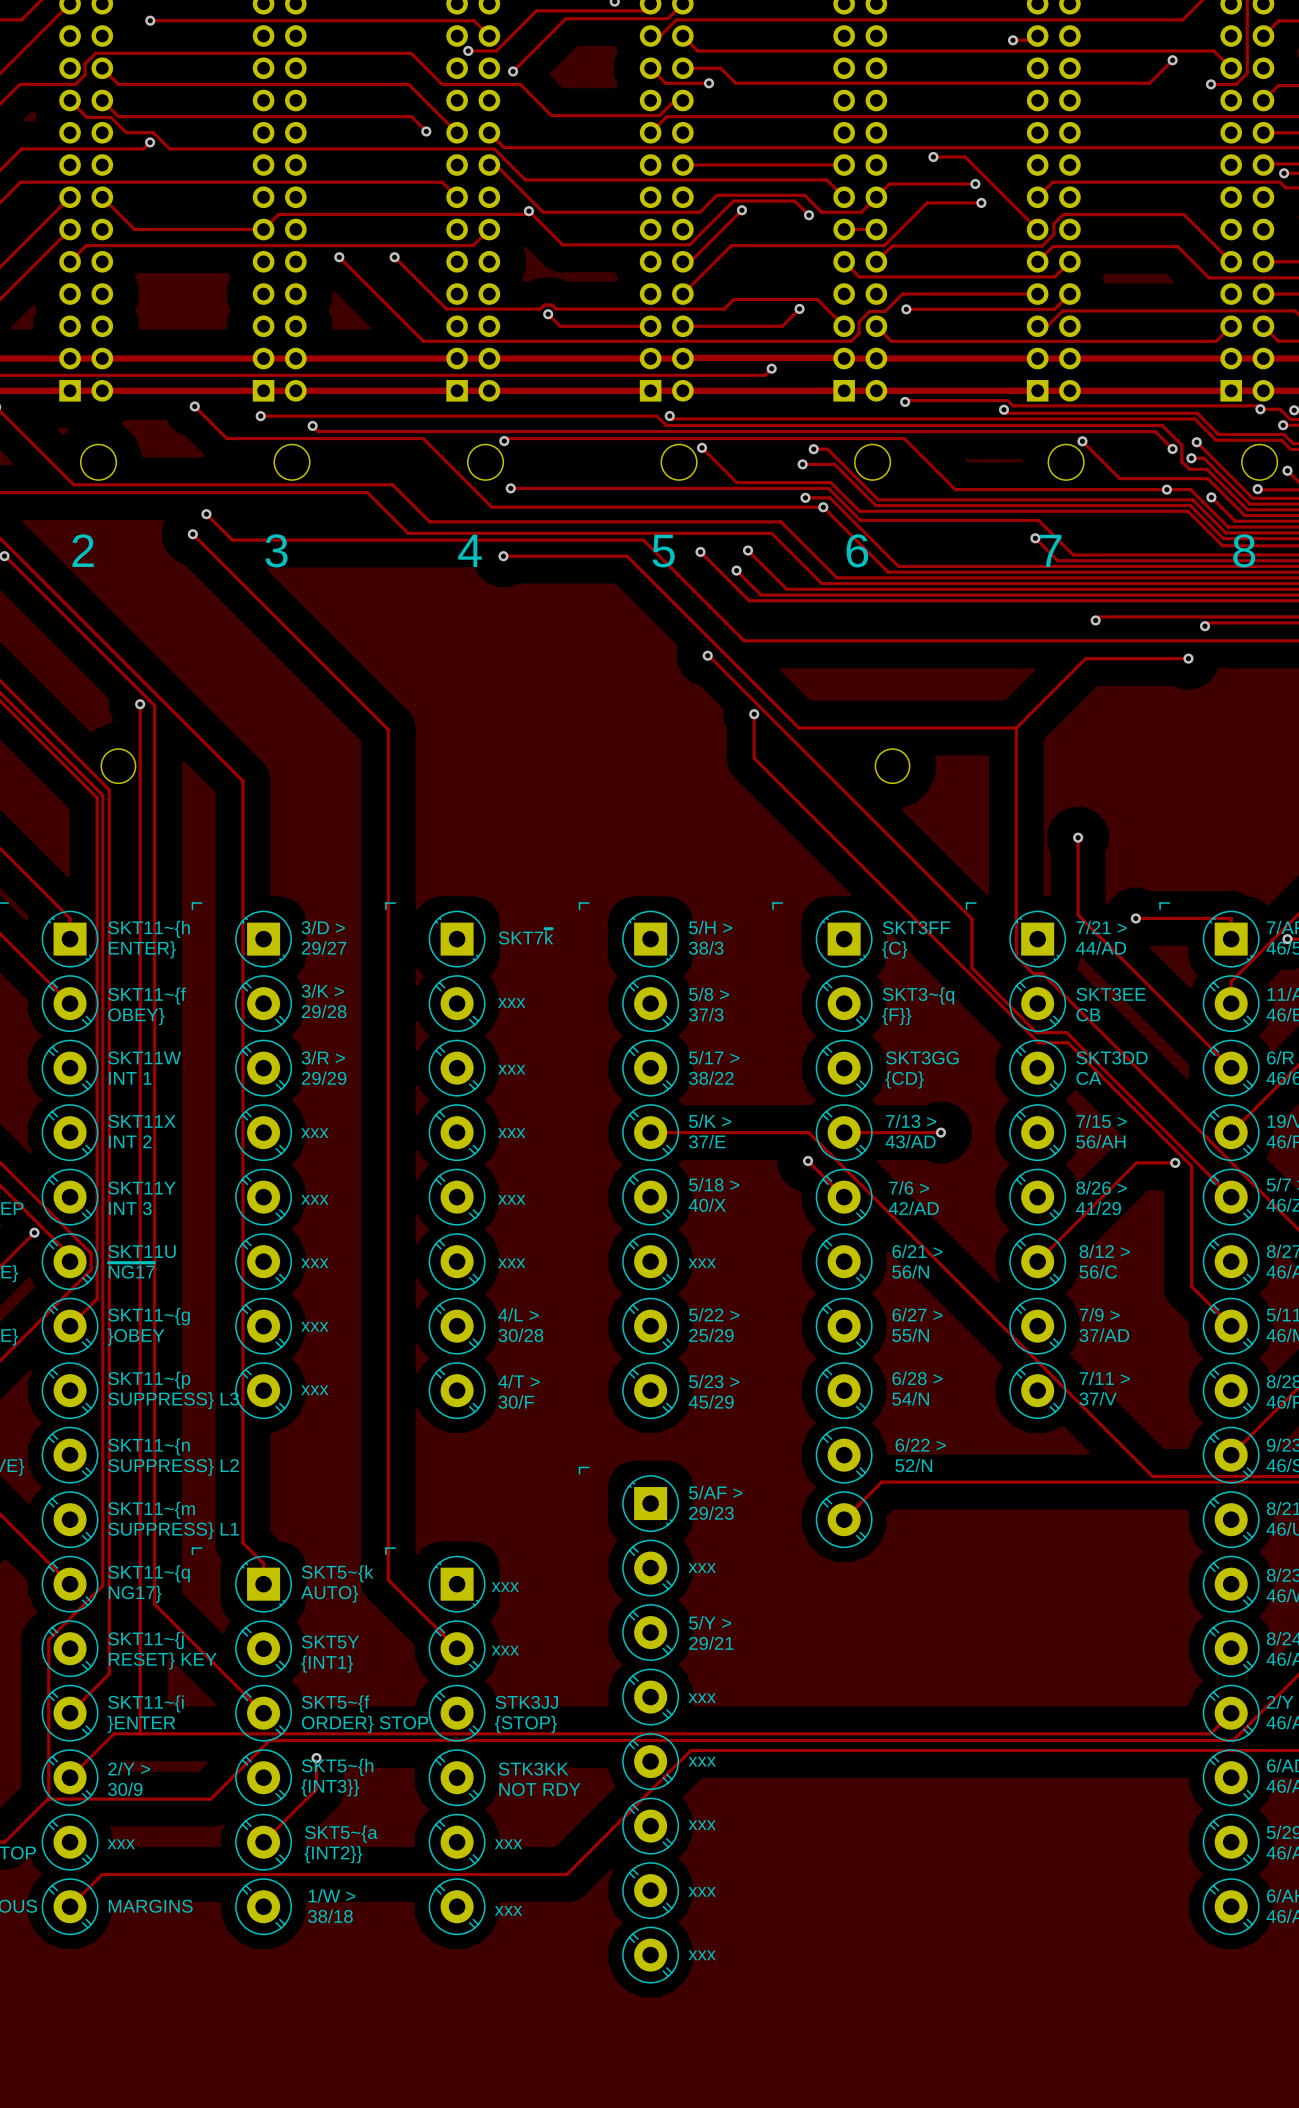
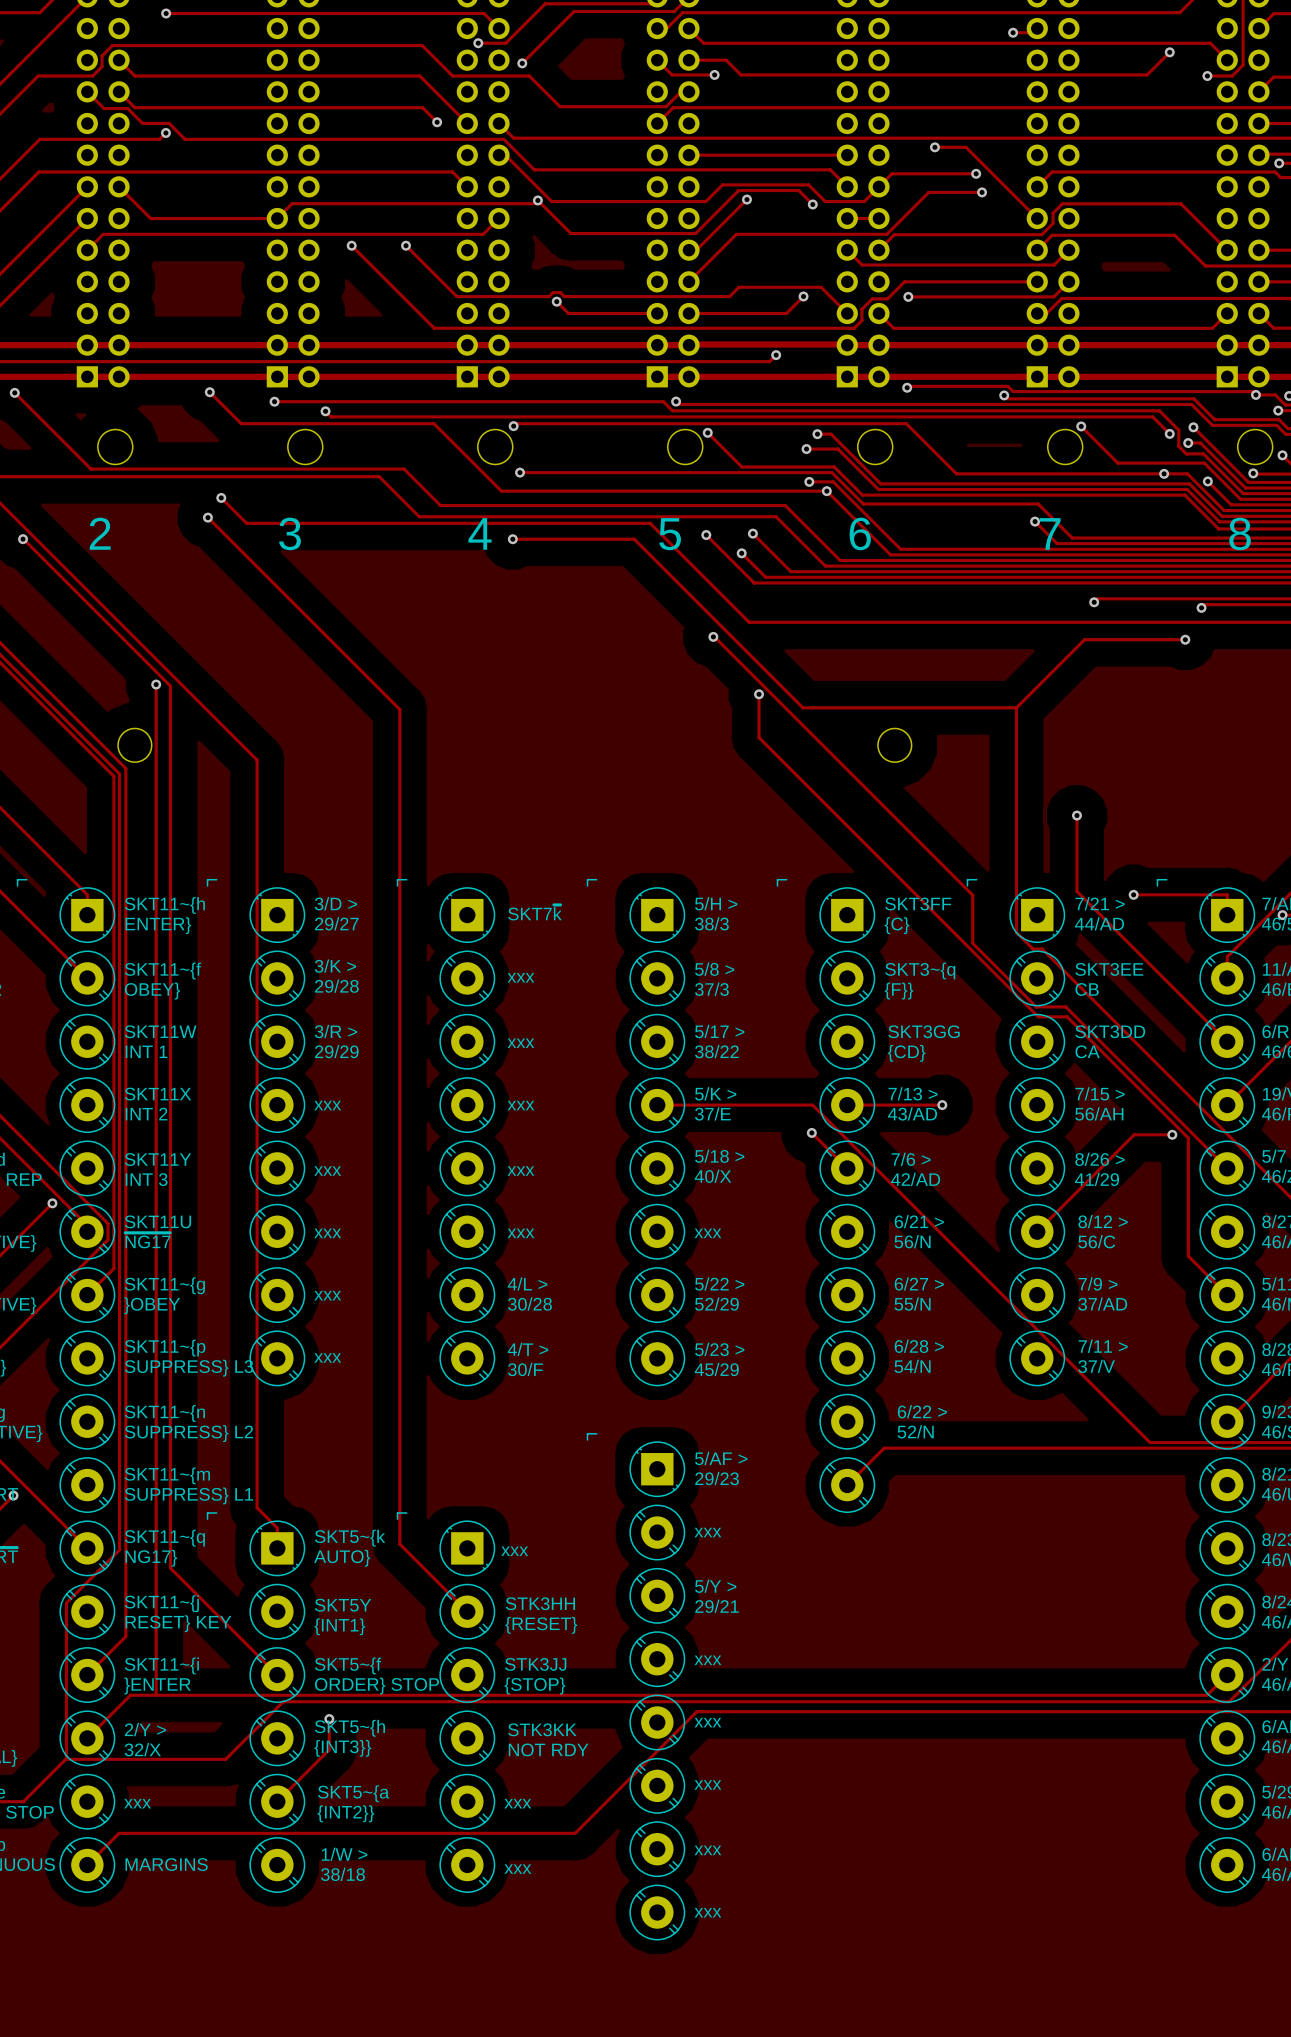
text: 25/29 (711, 1335) -> 52/29 (716, 1304)
text: none -> STK3HH (540, 1603)
text: xxx (505, 1650) -> none
text: none -> {RESET} (541, 1625)
text: 30/9 (125, 1789) -> 32/X (142, 1749)

